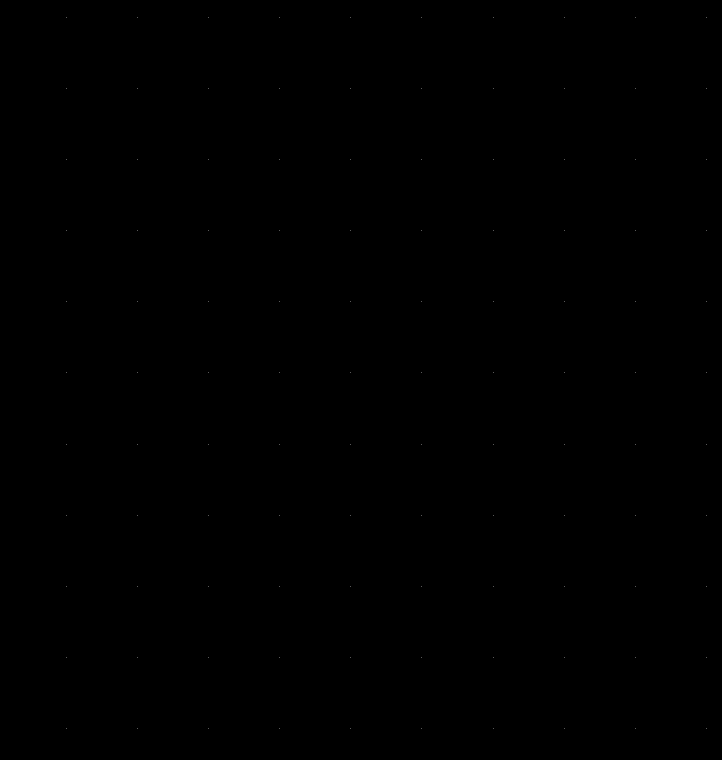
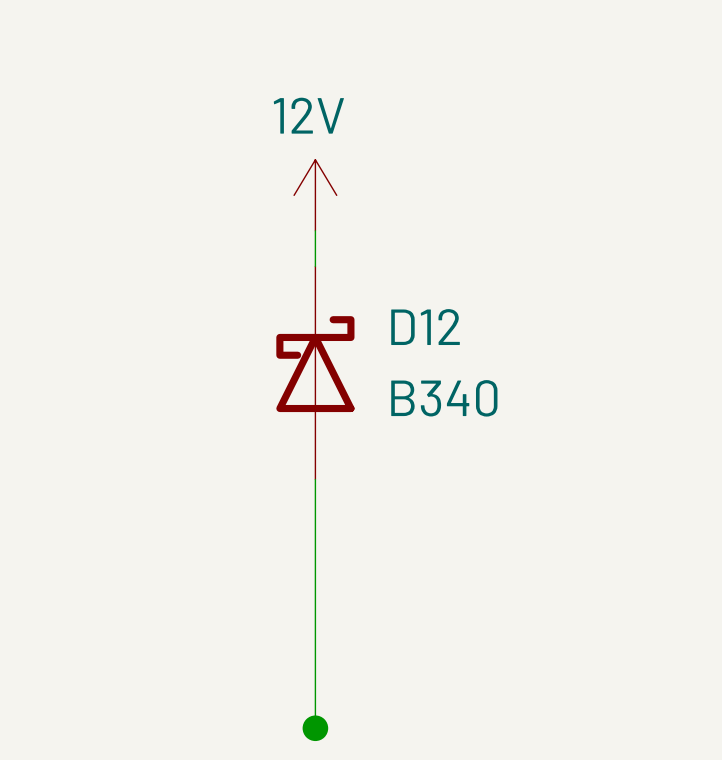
power symbol: none -> 12V (315, 195)
wire: none -> (315, 230) (315, 266)
D12: none -> B340 (315, 372)
wire: none -> (315, 479) (315, 728)
junction: none -> (315, 728)

